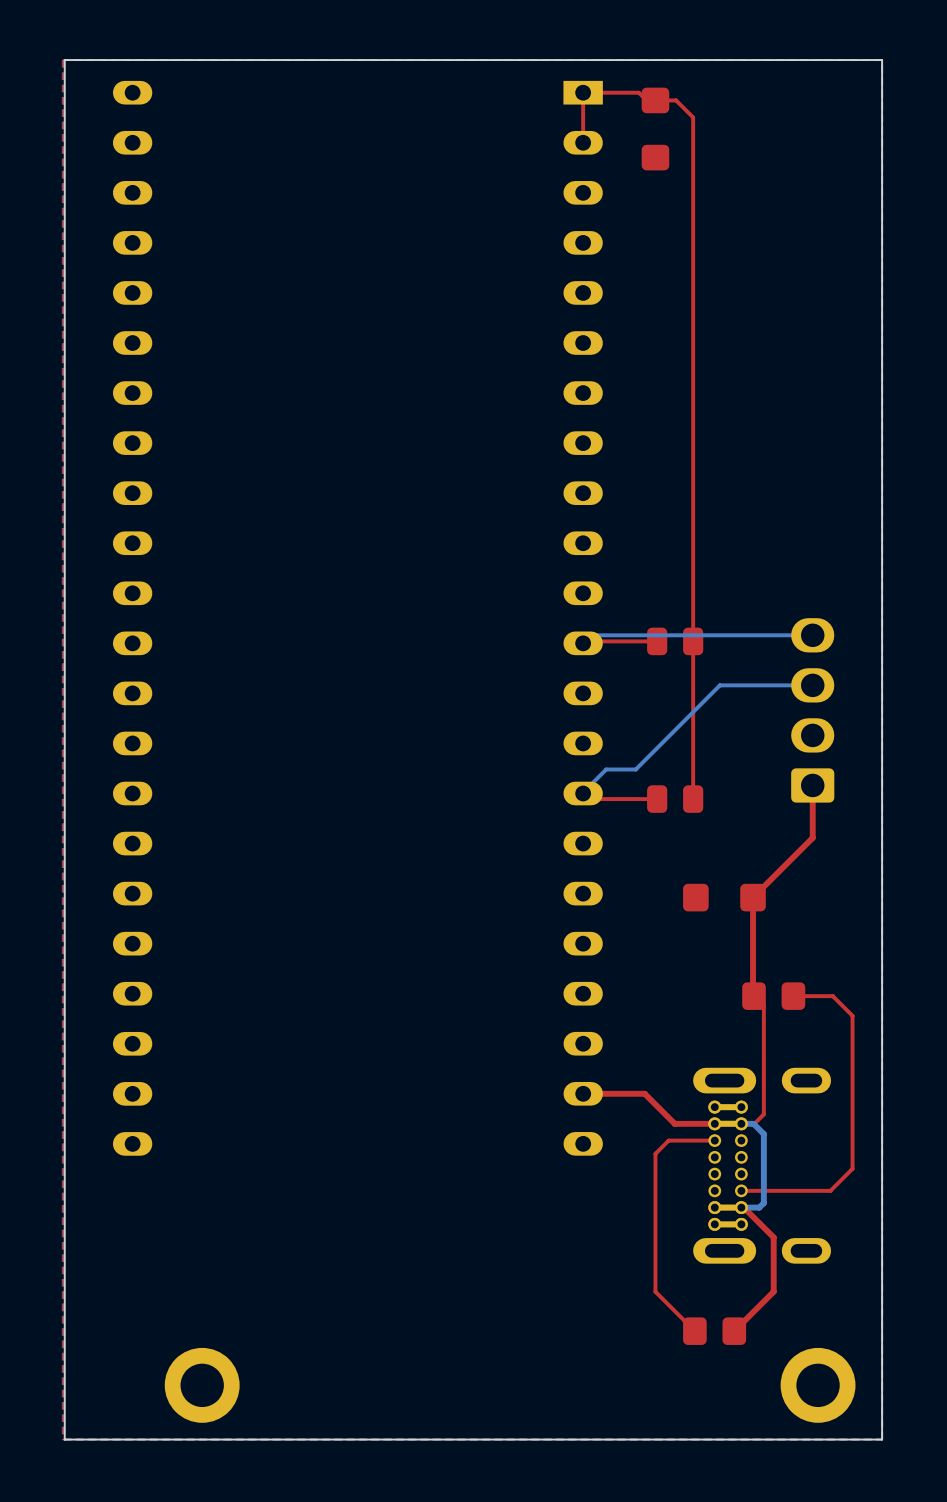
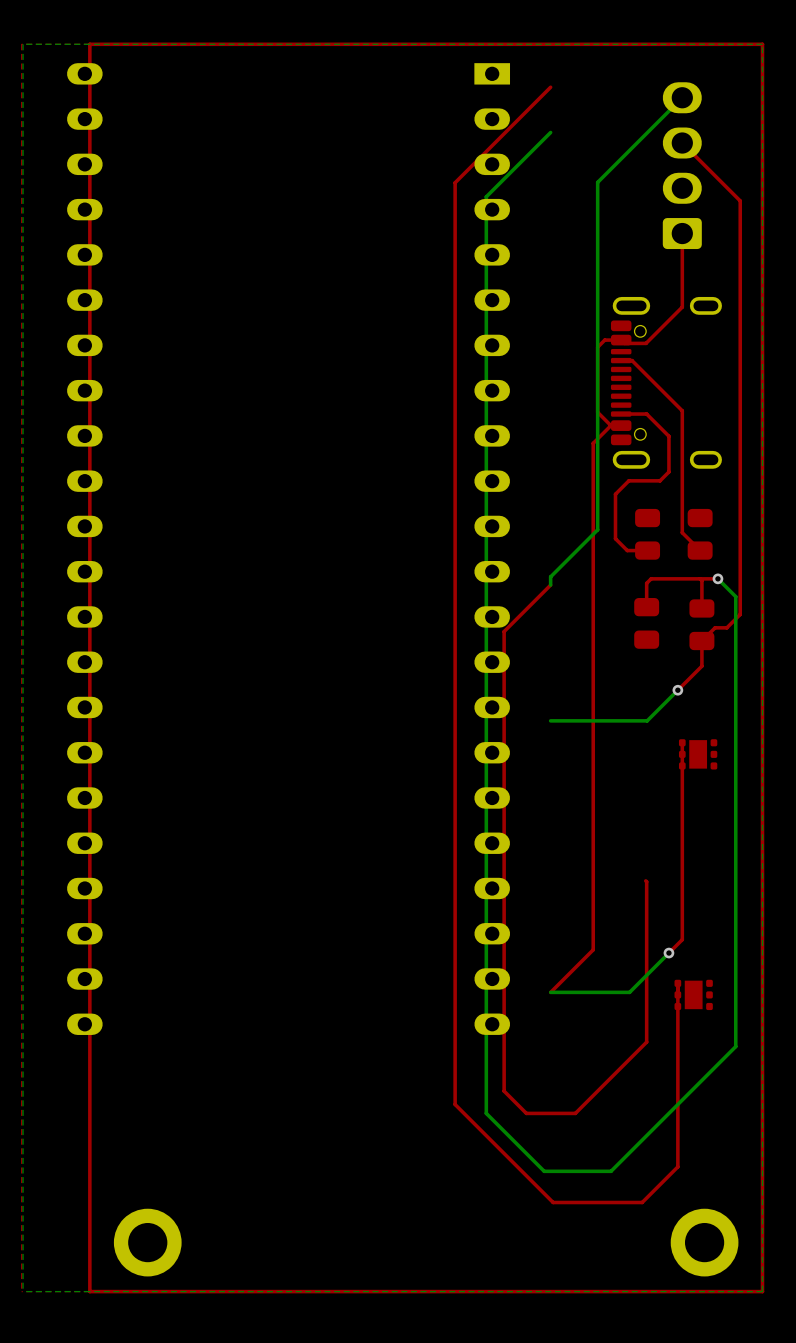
board edge: (882, 60) (64, 60) (64, 1439) (882, 1439) (882, 60) -> none
top track: none -> (762, 44) (89, 44) (89, 1291) (762, 1291) (762, 44)
top track: none -> (550, 87) (455, 182) (455, 1104) (553, 1202) (642, 1202) (677, 1166) (677, 983)
bottom track: none -> (682, 97) (597, 182) (597, 529) (550, 576) (550, 585)
part: (655, 129) -> none
top track: (583, 142) (583, 92) (638, 92) (646, 100) (676, 100) (693, 117) (693, 799) (694, 797) -> none
bottom track: none -> (550, 132) (486, 196) (486, 1113) (544, 1171) (611, 1171) (735, 1046) (735, 596) (717, 578)
top track: none -> (682, 143) (740, 200) (740, 614) (726, 627) (715, 627) (701, 641) (701, 666) (677, 690)
part: none -> (682, 165)
top track: none -> (682, 233) (682, 307) (646, 343) (624, 343) (621, 340) (604, 340) (597, 347) (597, 412) (610, 425)
top track: none -> (621, 360) (632, 360) (682, 410) (682, 532) (700, 550)
part: none -> (666, 382)
top track: none -> (621, 414) (646, 414) (668, 436) (668, 471) (660, 480) (628, 480) (615, 494) (615, 538) (627, 550) (647, 550)
top track: none -> (610, 425) (593, 443) (593, 949) (550, 992)
part: none -> (647, 534)
part: none -> (700, 534)
part footprint: [791, 618, 835, 803] -> [689, 599, 715, 651]
bottom track: (812, 635) (591, 635) (583, 643) -> none
top track: (657, 641) (585, 641) (583, 643) -> none
part: (675, 641) -> none
top track: none -> (700, 578) (701, 580) (701, 608)
top track: none -> (717, 578) (651, 578) (646, 583) (646, 607)
via: none -> (717, 578)
top track: none -> (550, 585) (504, 631) (504, 1091) (526, 1113) (575, 1113) (646, 1042) (646, 890)
bottom track: (812, 685) (719, 685) (635, 769) (606, 769) (583, 793) -> none
part: none -> (646, 623)
bottom track: none -> (677, 690) (647, 720) (550, 720)
via: none -> (677, 690)
top track: (812, 785) (812, 837) (753, 897) (753, 995) (763, 1005) (763, 1114) (754, 1123) (741, 1123) -> none
top track: (583, 793) (588, 799) (657, 799) -> none
part: (675, 799) -> none
top track: none -> (682, 742) (682, 939) (668, 953)
part: none -> (698, 754)
part: (724, 897) -> none
part: (773, 996) -> none
top track: (793, 996) (832, 996) (852, 1015) (852, 1168) (830, 1190) (741, 1190) -> none
bottom track: none -> (668, 953) (629, 992) (550, 992)
via: none -> (668, 953)
top track: (583, 1093) (644, 1093) (674, 1123) (714, 1123) -> none
part: none -> (693, 994)
bottom track: (741, 1123) (753, 1123) (763, 1134) (763, 1203) (759, 1207) (741, 1207) -> none
top track: (714, 1140) (668, 1140) (655, 1153) (655, 1291) (694, 1331) -> none
part: (762, 1165) -> none
top track: (741, 1207) (743, 1207) (773, 1237) (773, 1291) (734, 1331) -> none
part: (714, 1331) -> none

